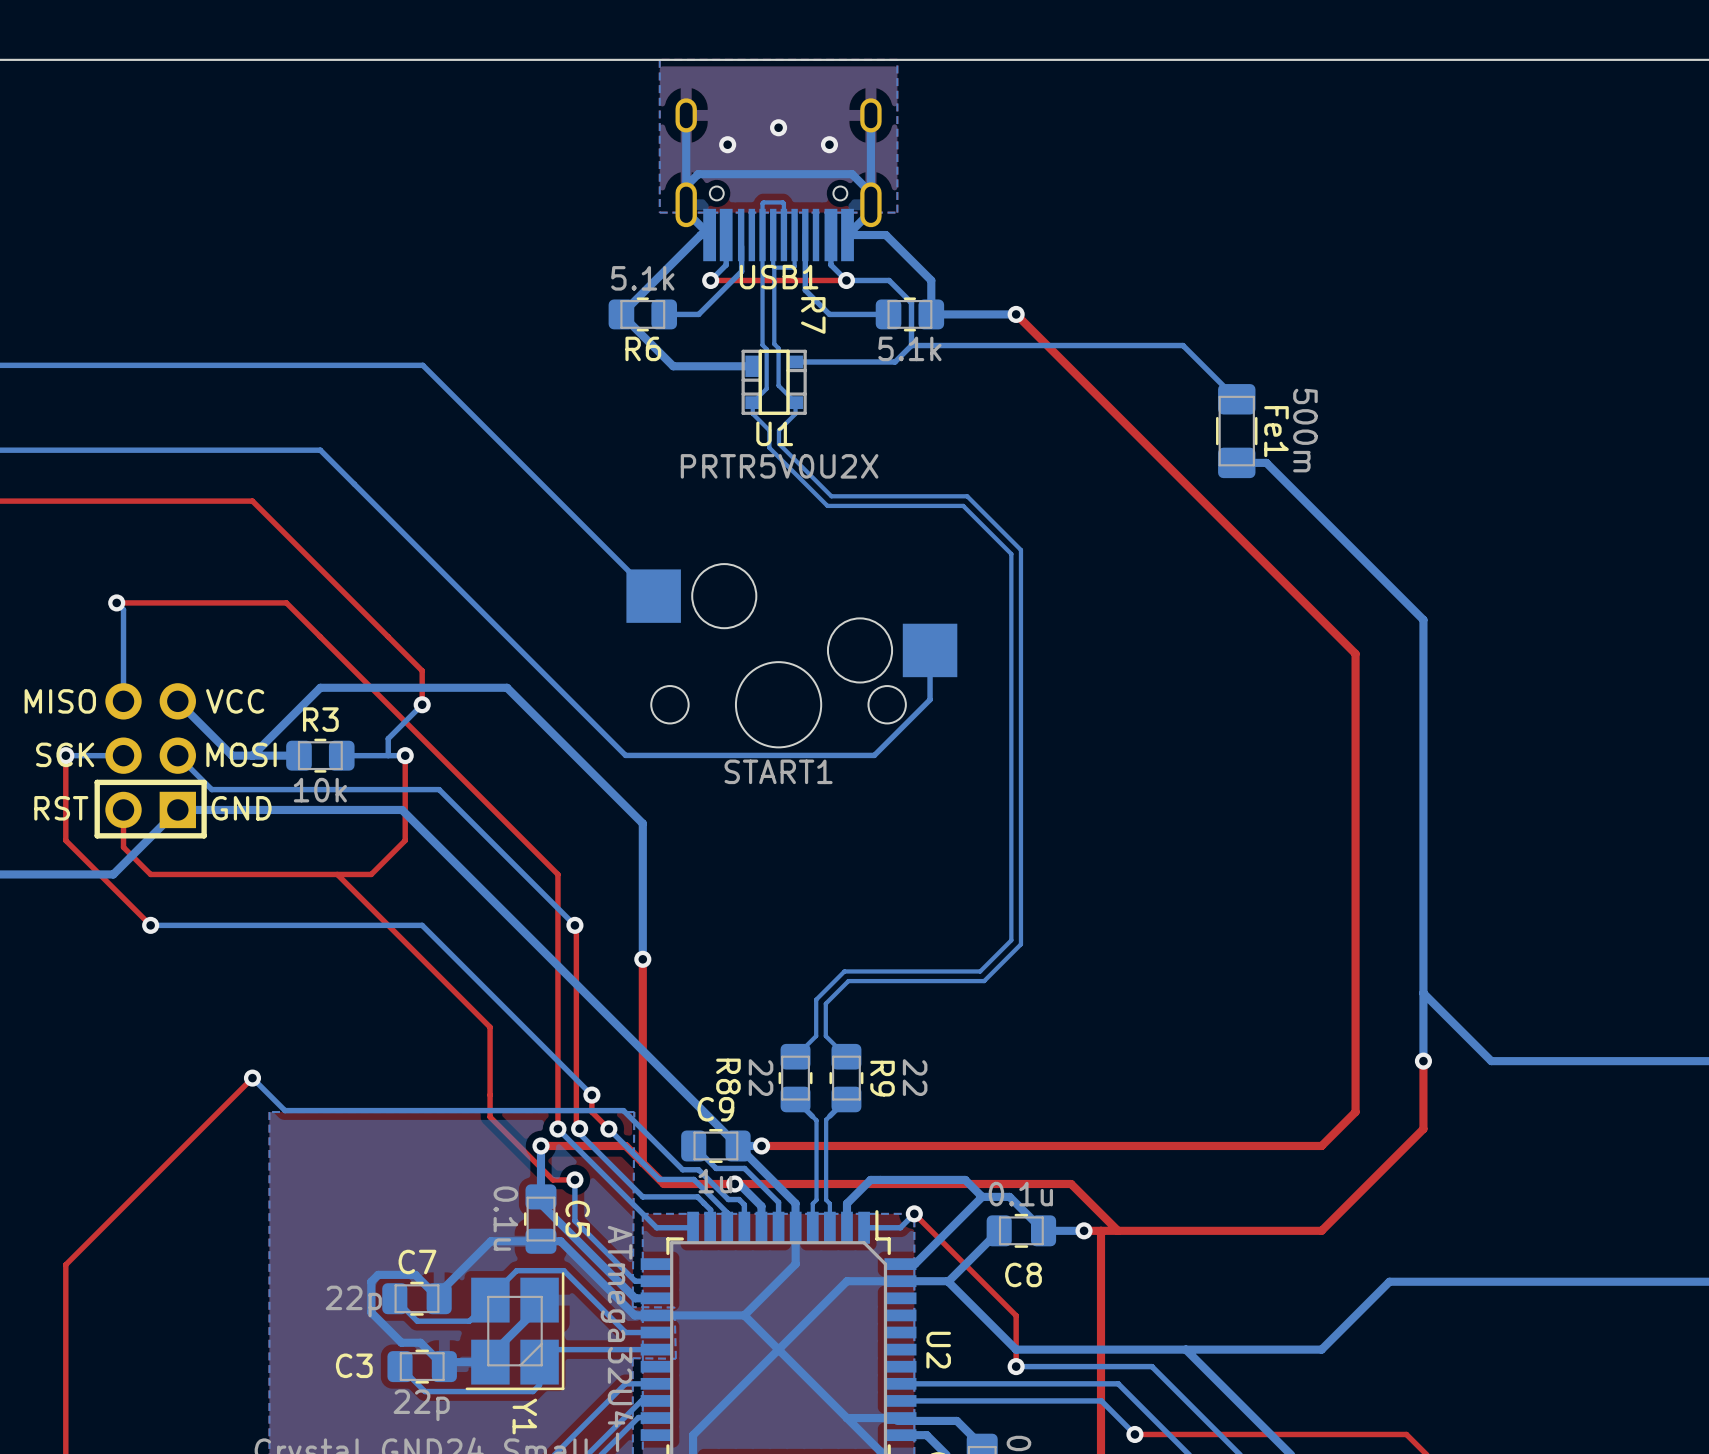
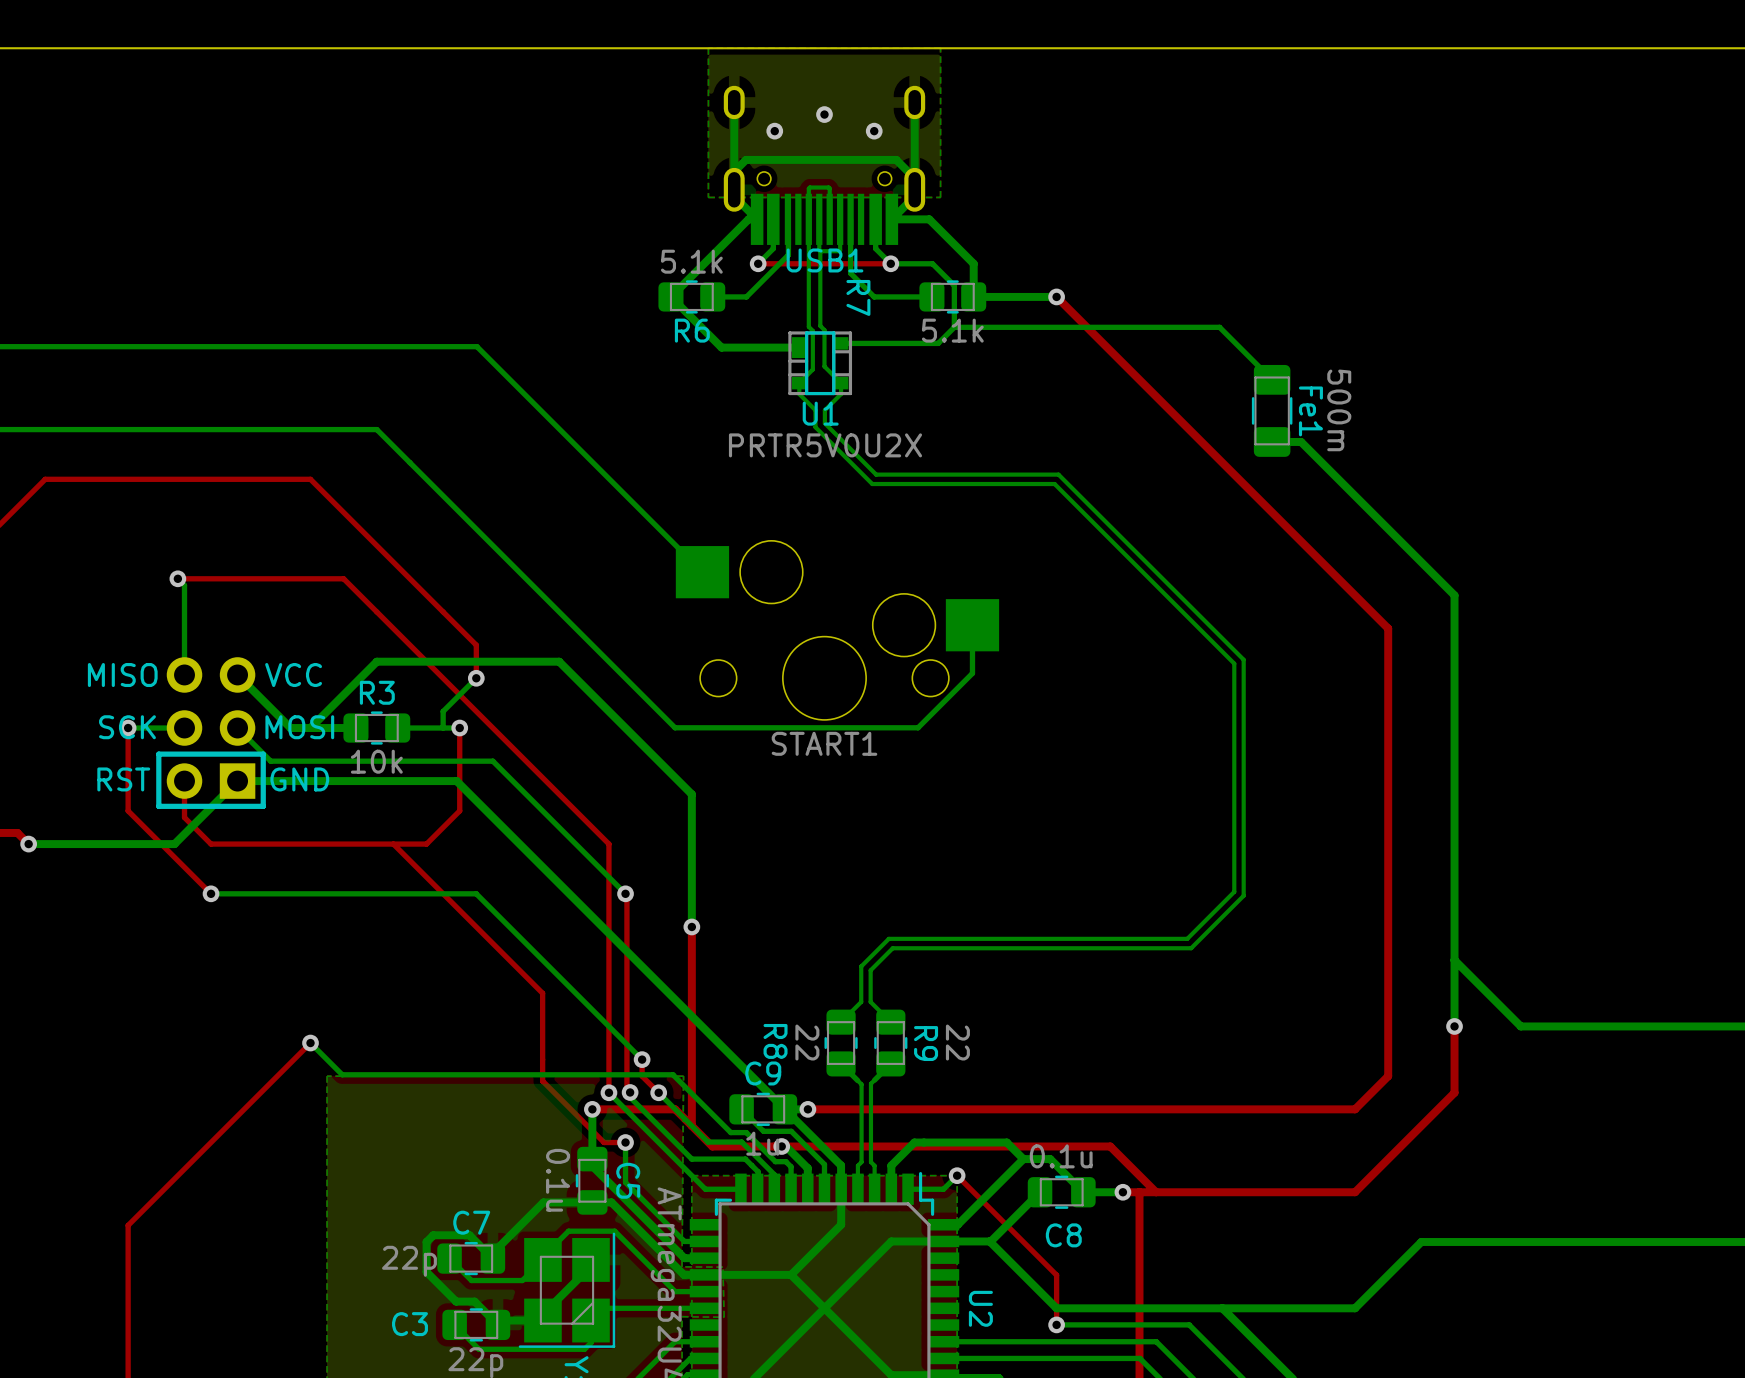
bottom track: (967, 496) (1020, 550) (1020, 944) (984, 981) -> (1008, 474) (1058, 474) (1243, 659) (1243, 895) (1191, 948) (1025, 948)
bottom track: (963, 505) (1011, 554) (1011, 940) (980, 971) -> (1004, 484) (1054, 484) (1234, 663) (1234, 891) (1187, 938) (1021, 938)

